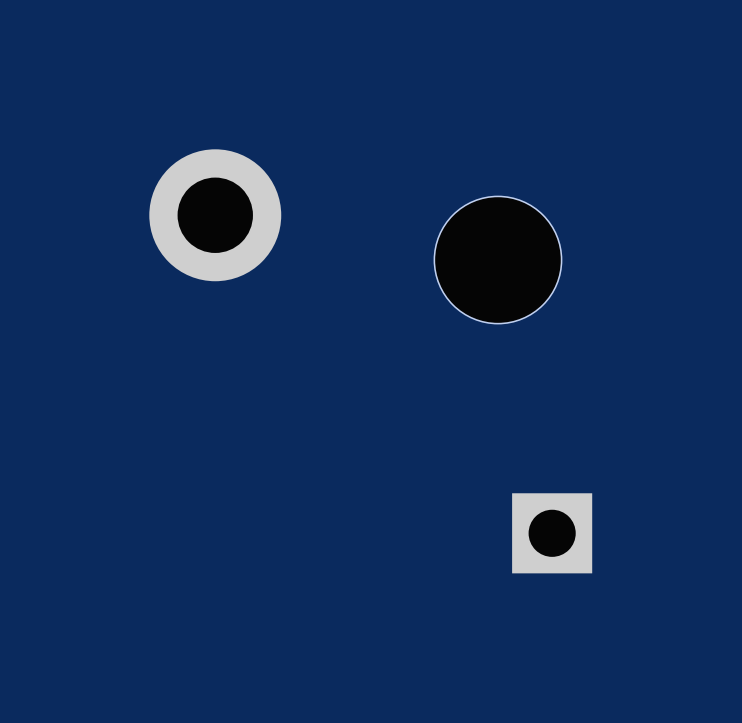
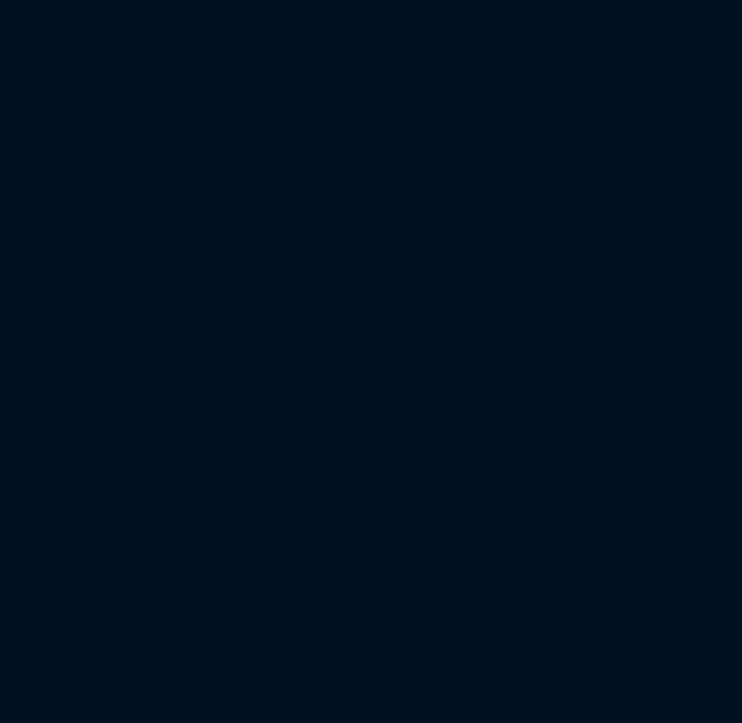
part: (215, 215) -> none
part: (497, 260) -> none
part: (552, 533) -> none

